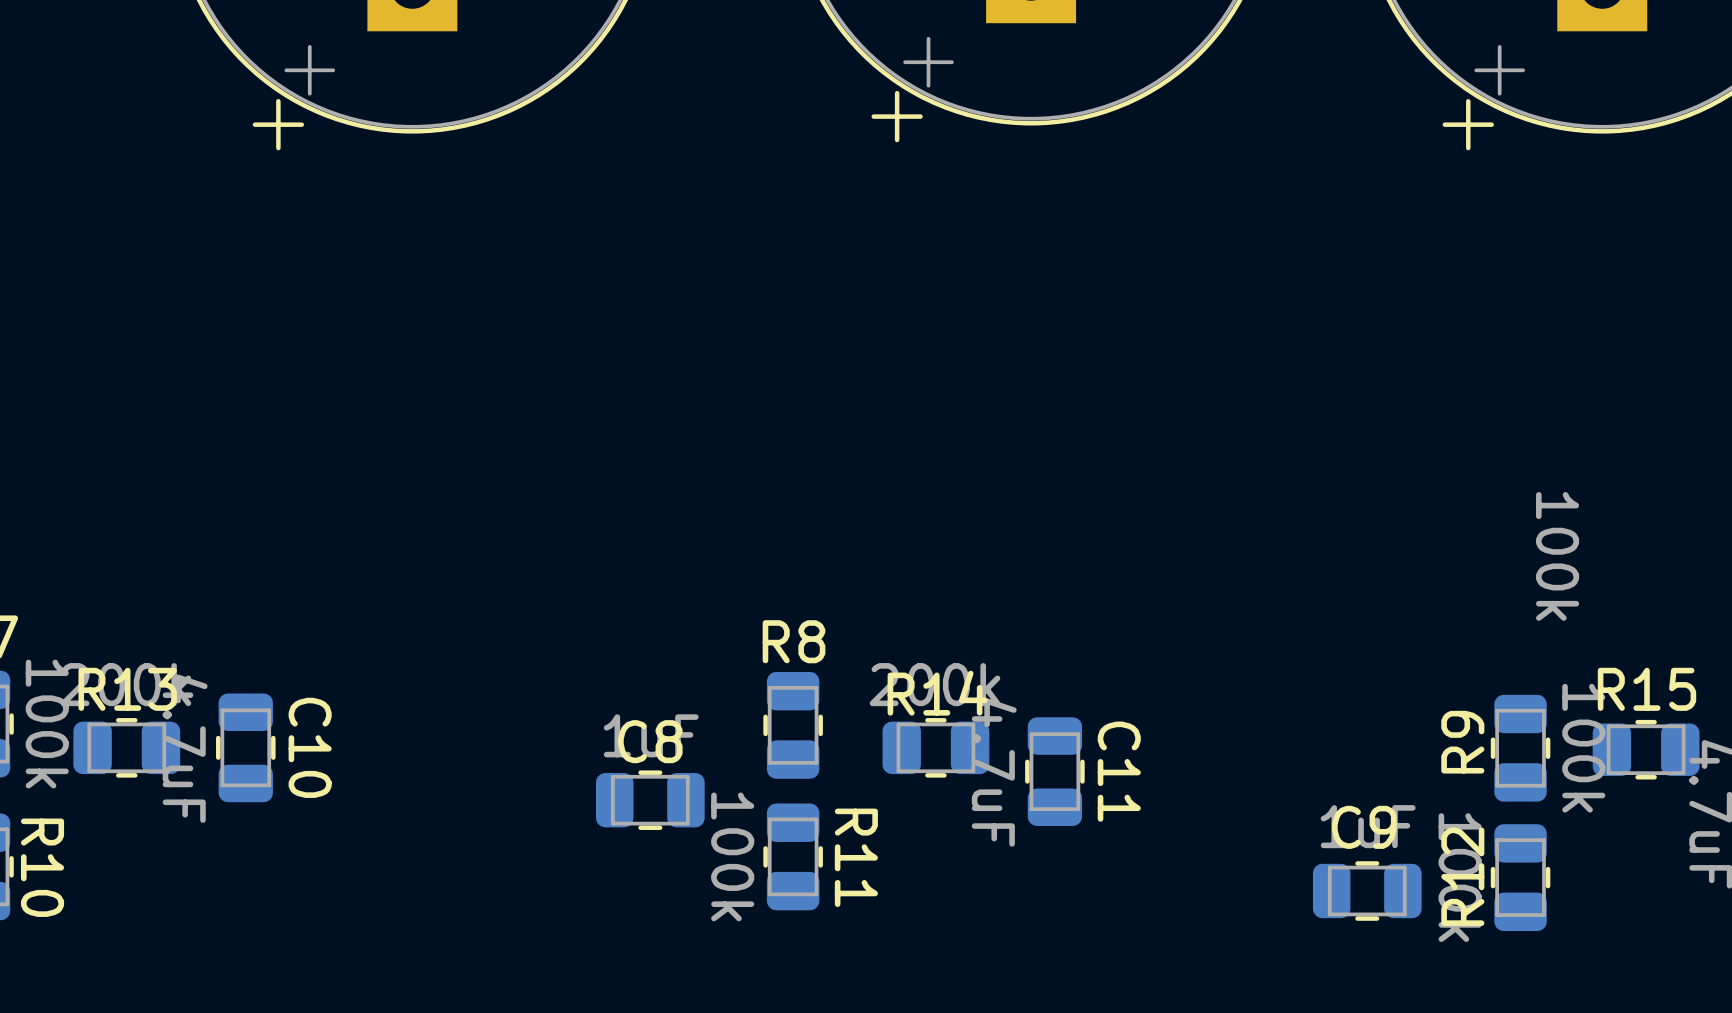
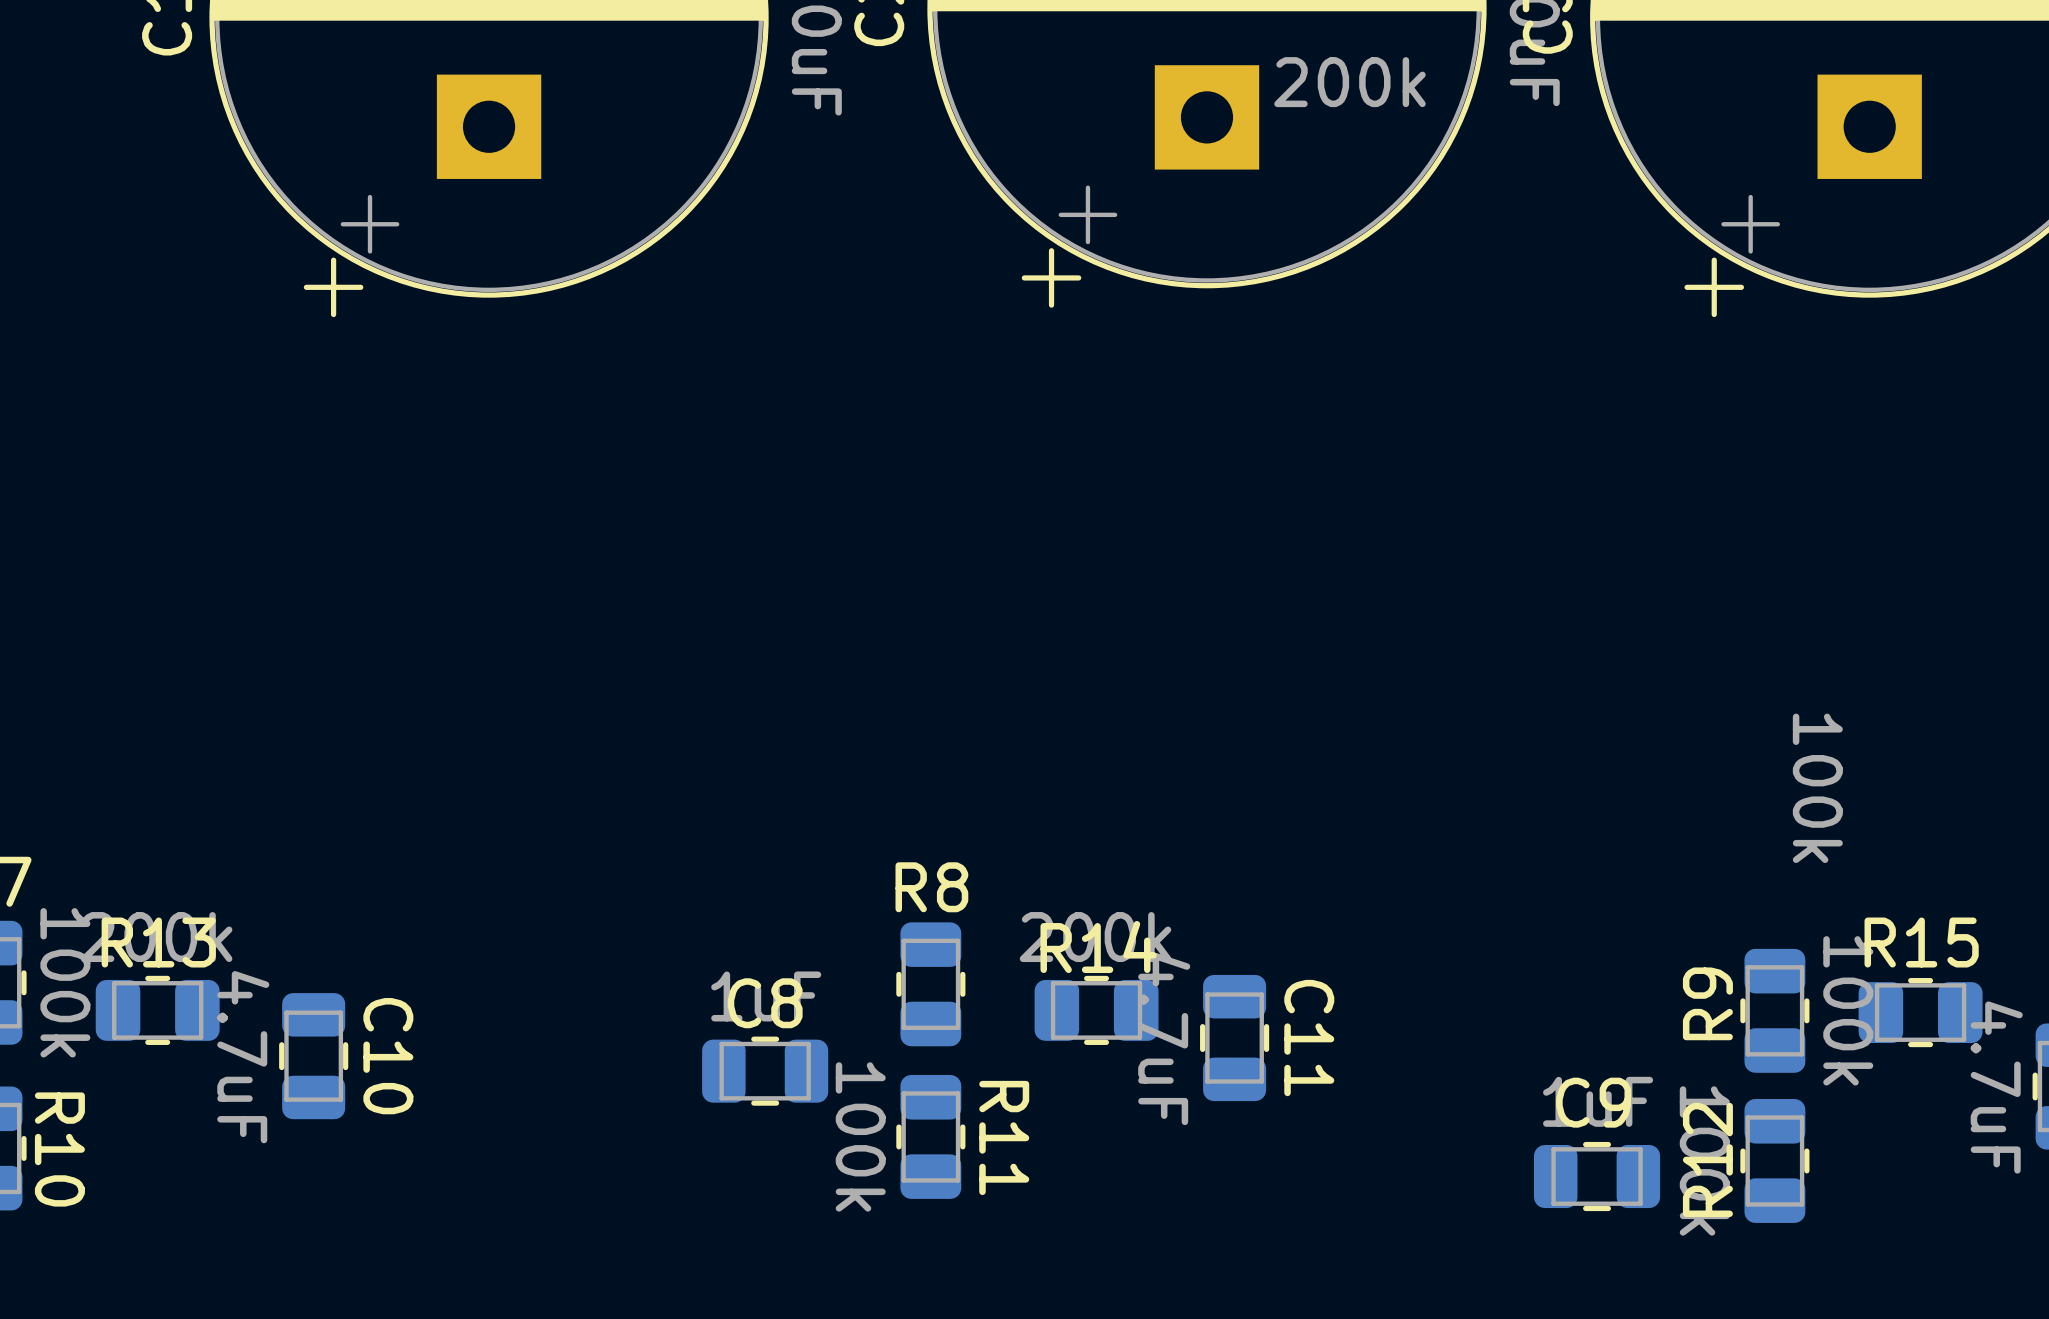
C10 position: (245, 747) -> (313, 1056)

